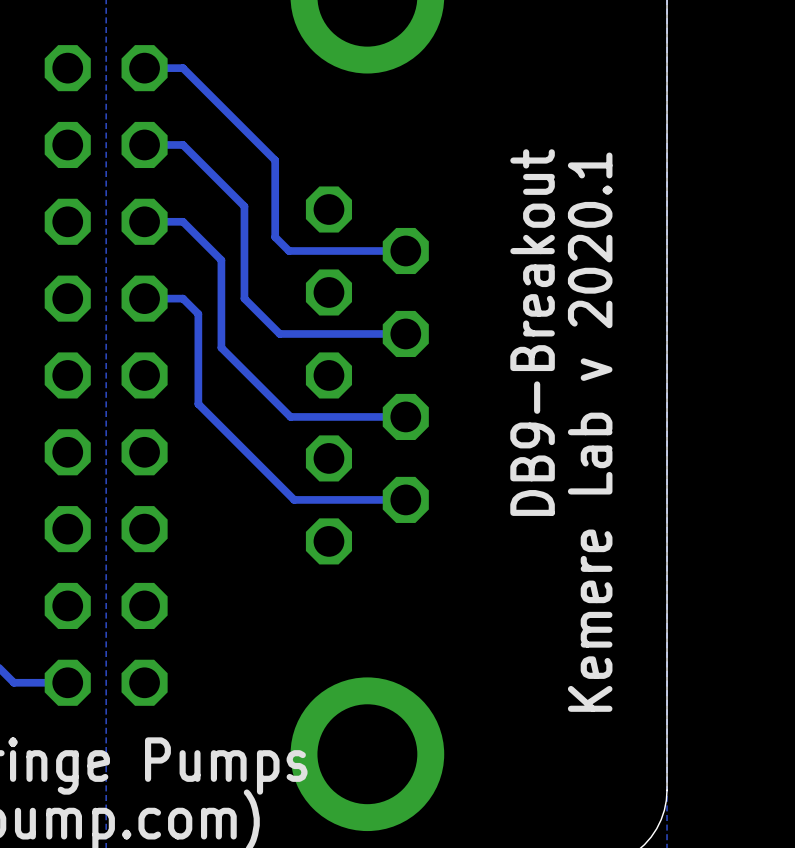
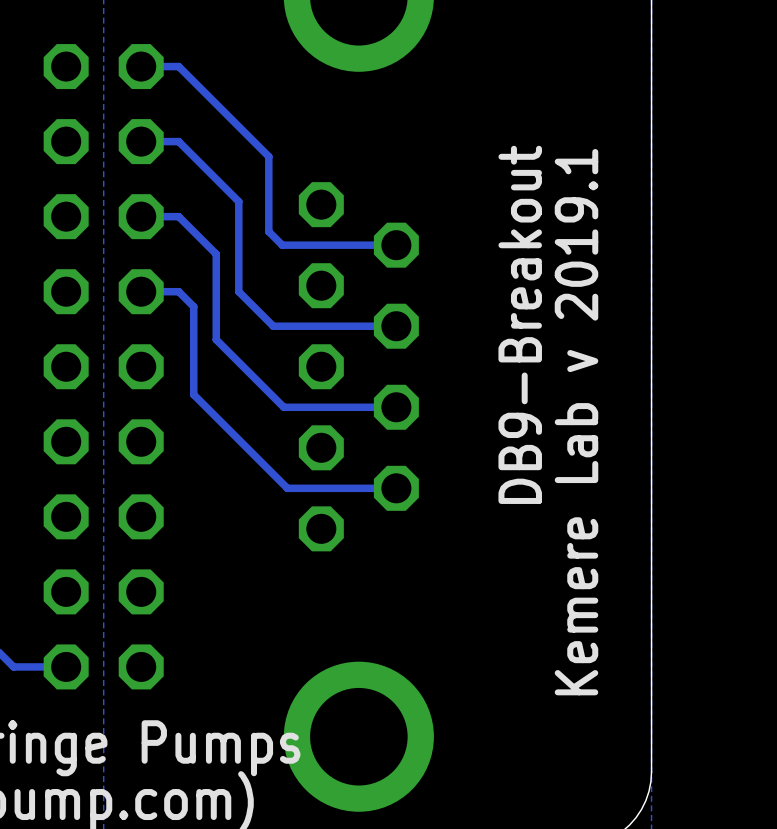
text: Kemere Lab v 2020.1 (590, 432) -> Kemere Lab v 2019.1 (576, 422)

